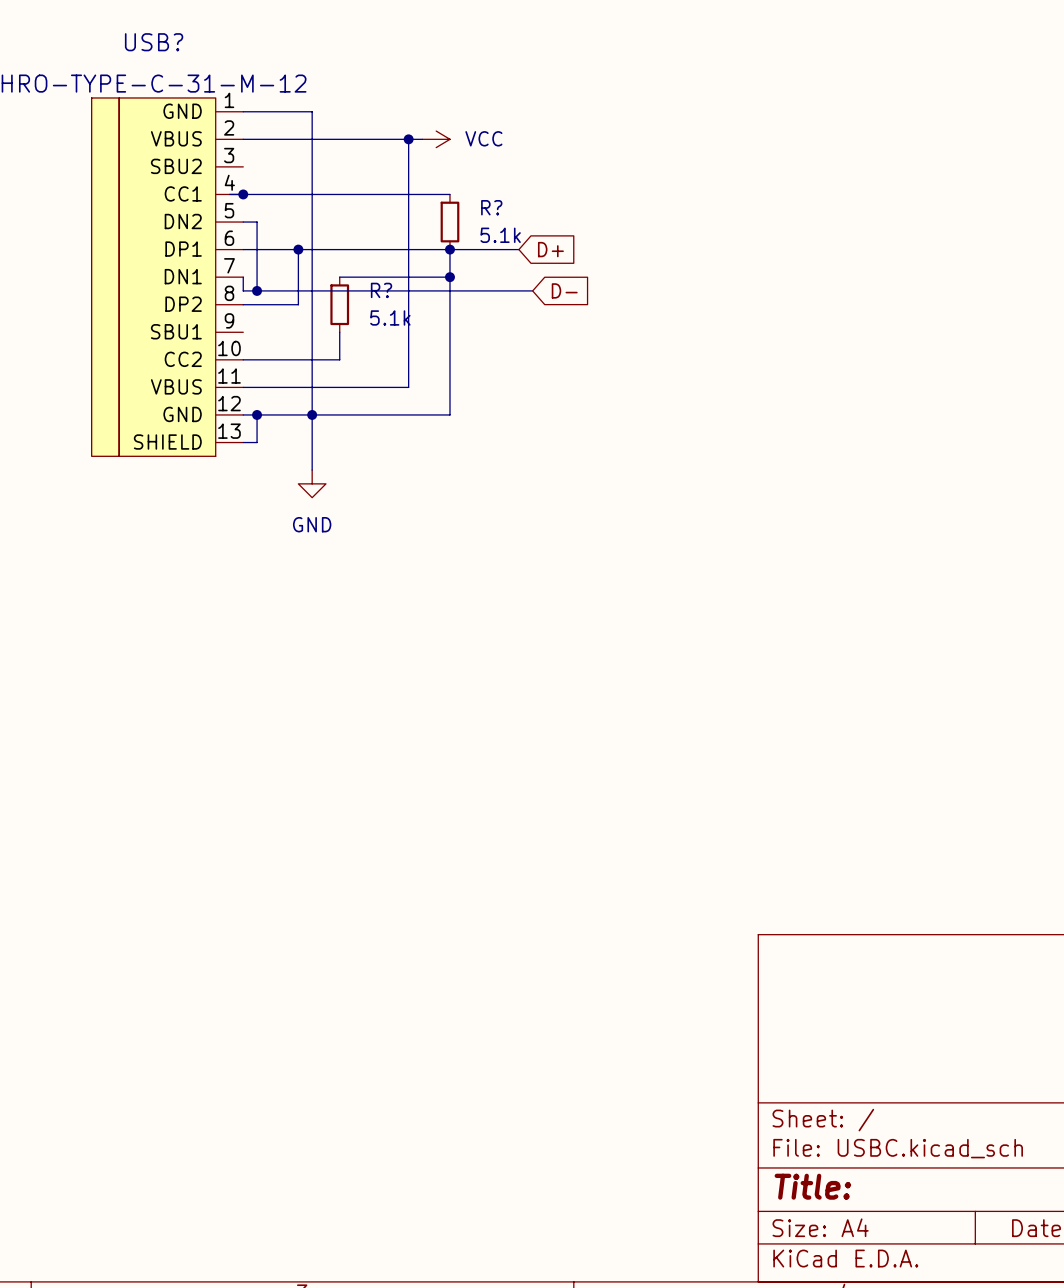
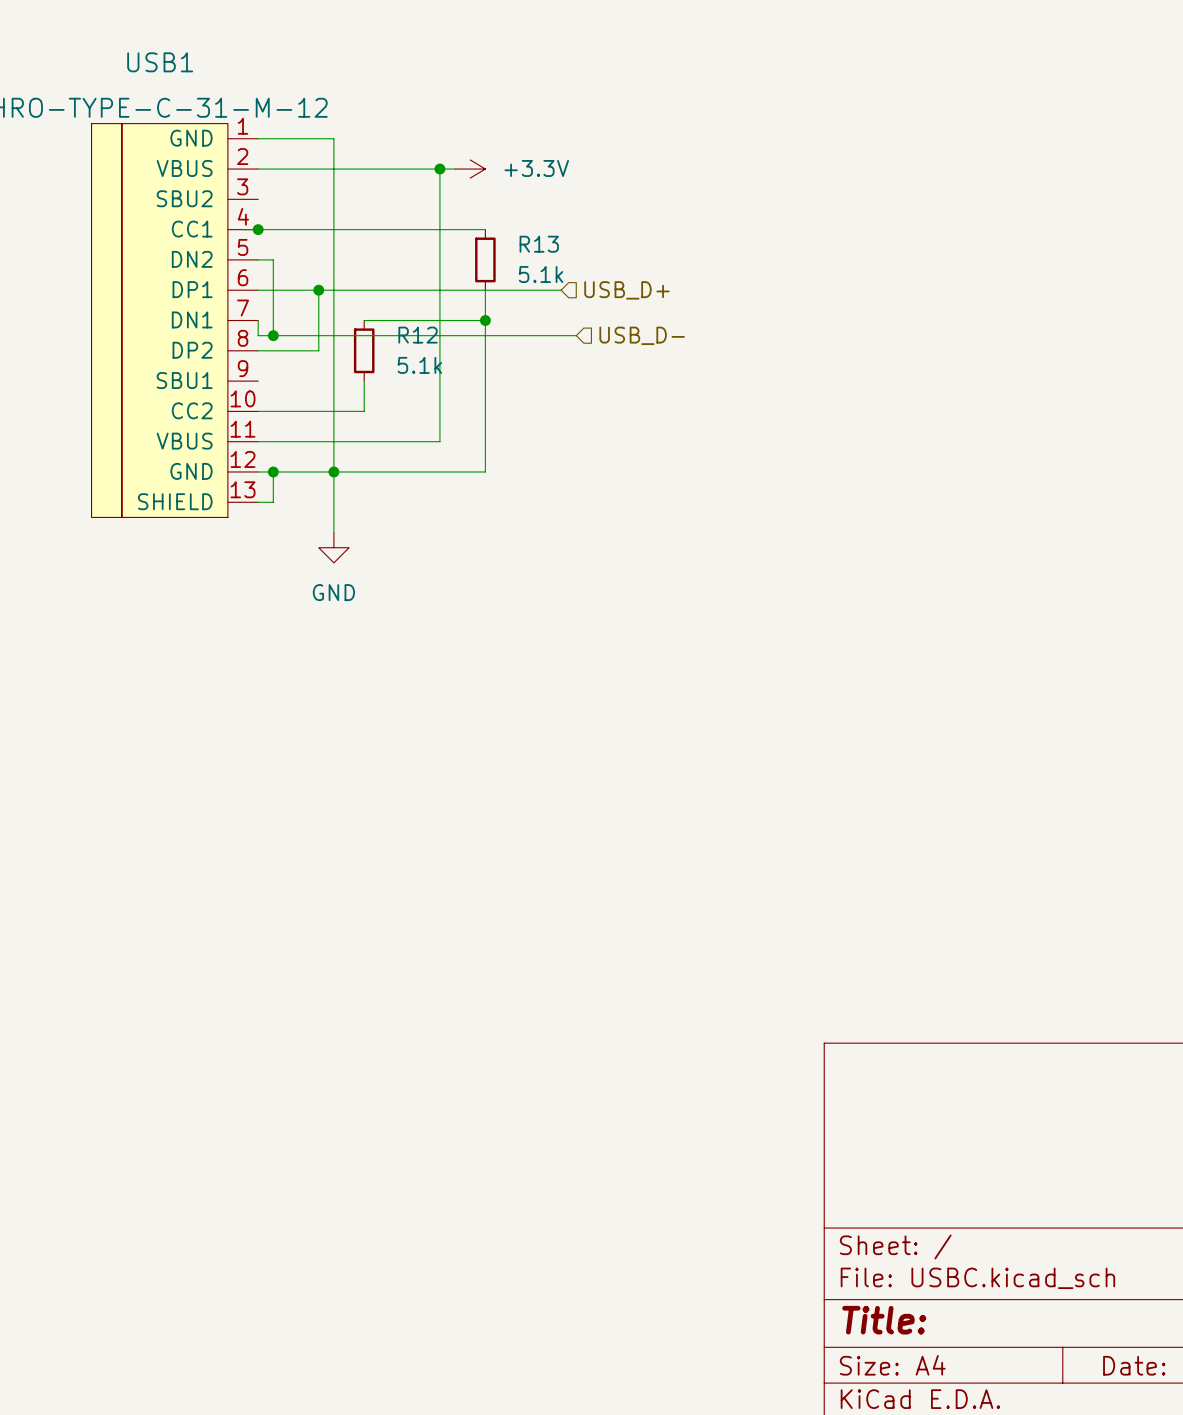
USB? name: USB? (154, 42) -> USB1 (160, 62)
power symbol: VCC (436, 139) -> +3.3V (470, 169)
R? name: R? (491, 207) -> R13 (539, 244)
junction: (449, 249) -> none
global label: D+ (550, 249) -> none
hierarchical label: none -> USB_D+ (627, 290)
R? name: R? (381, 290) -> R12 (418, 335)
global label: D- (564, 290) -> none
hierarchical label: none -> USB_D- (642, 335)

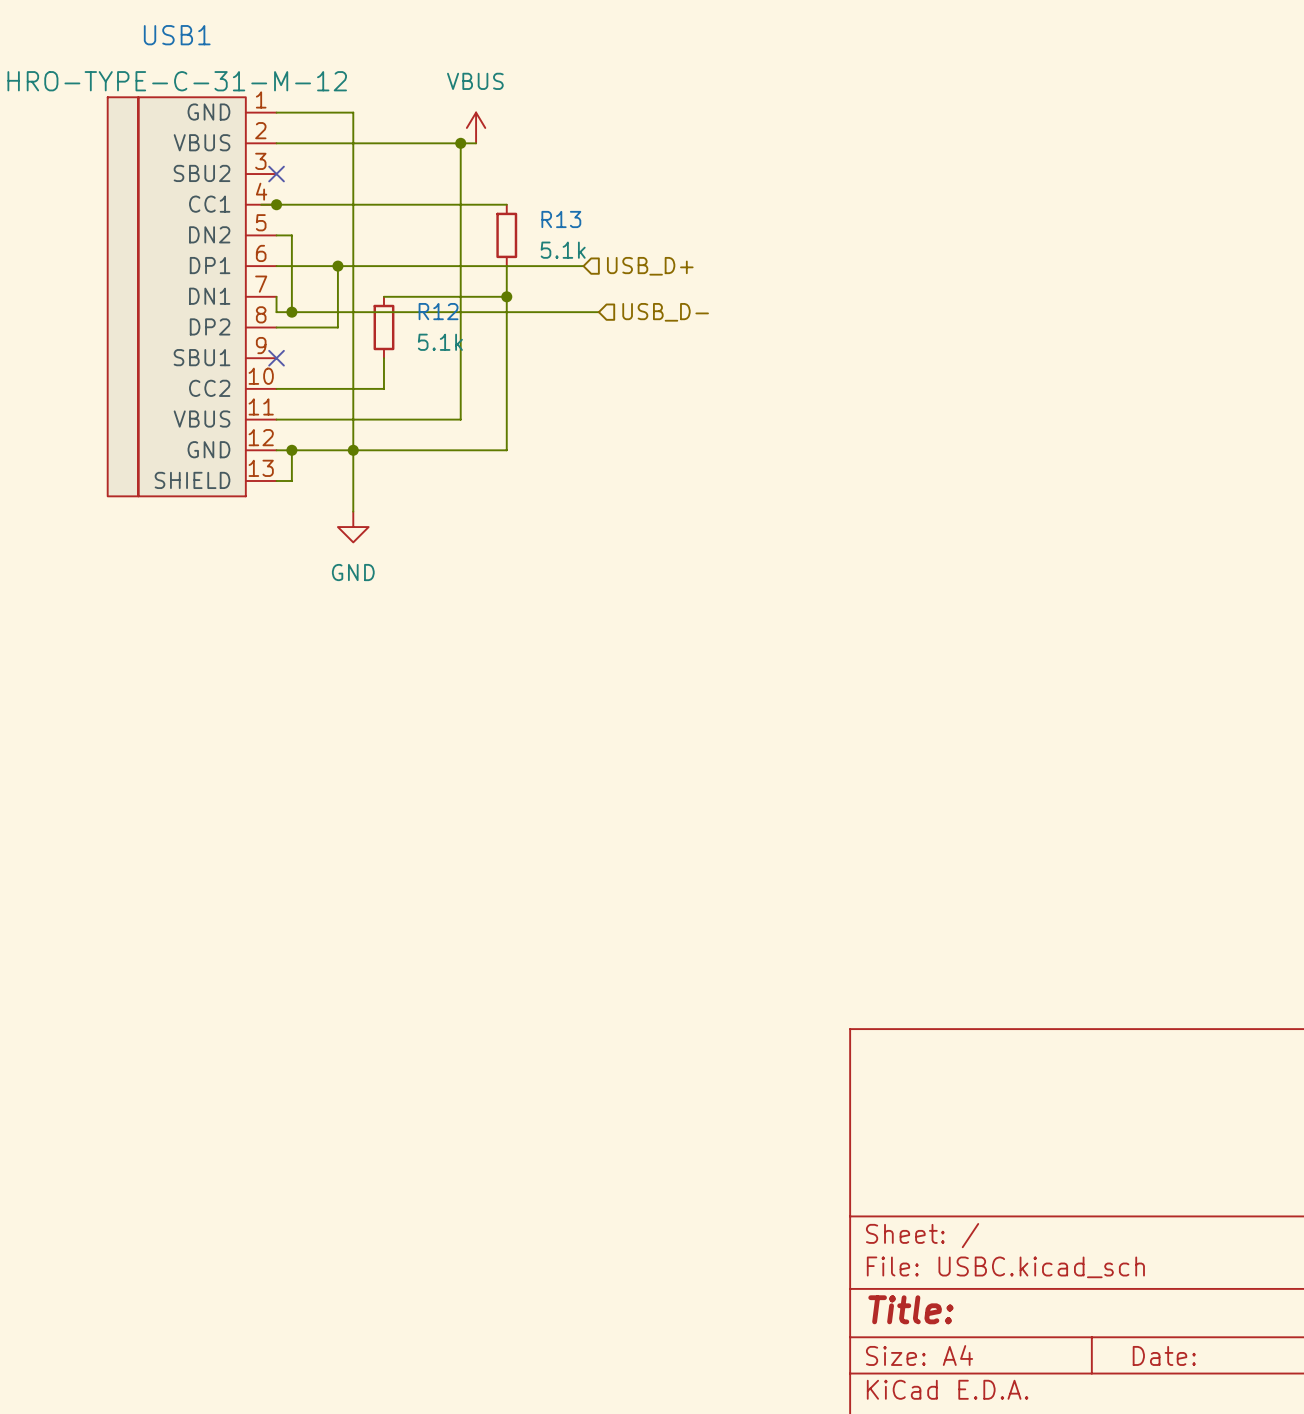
power symbol: none -> VBUS (476, 127)
power symbol: +3.3V (470, 169) -> none
no-connect mark: none -> (276, 174)
no-connect mark: none -> (276, 358)

